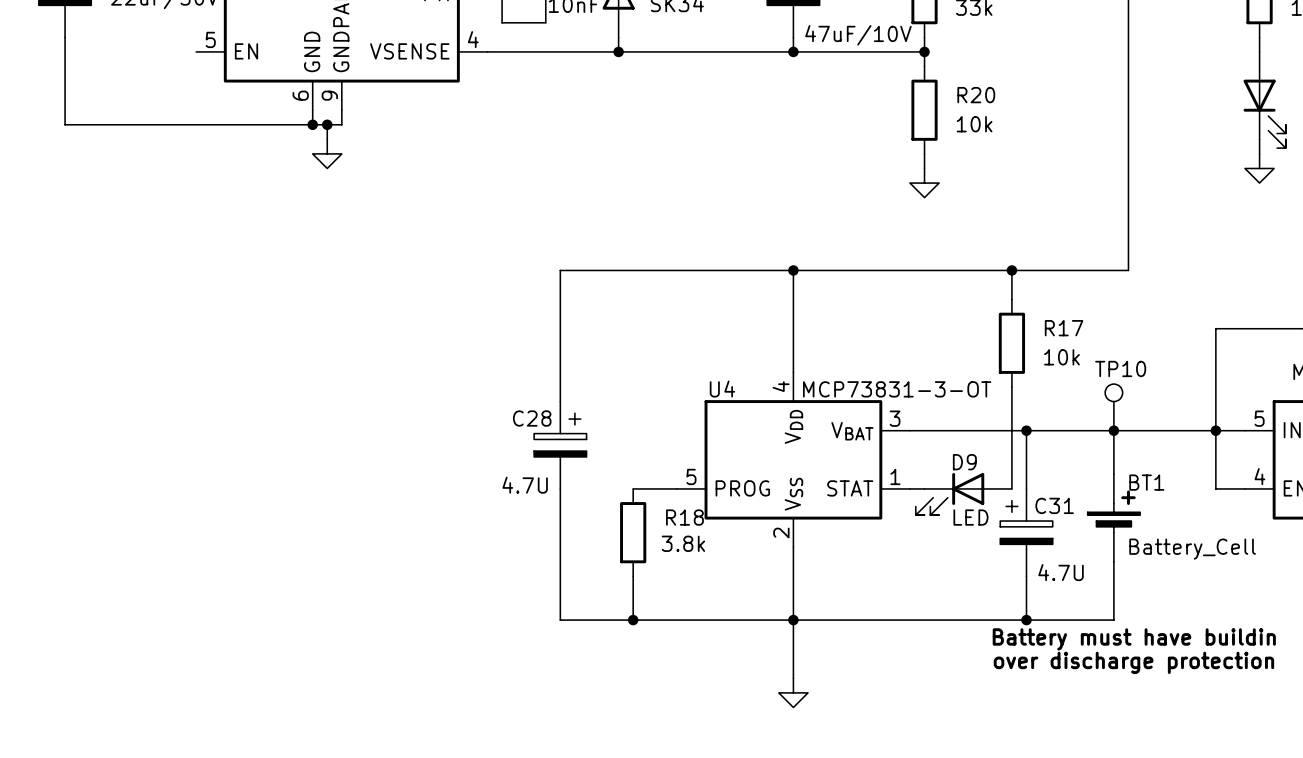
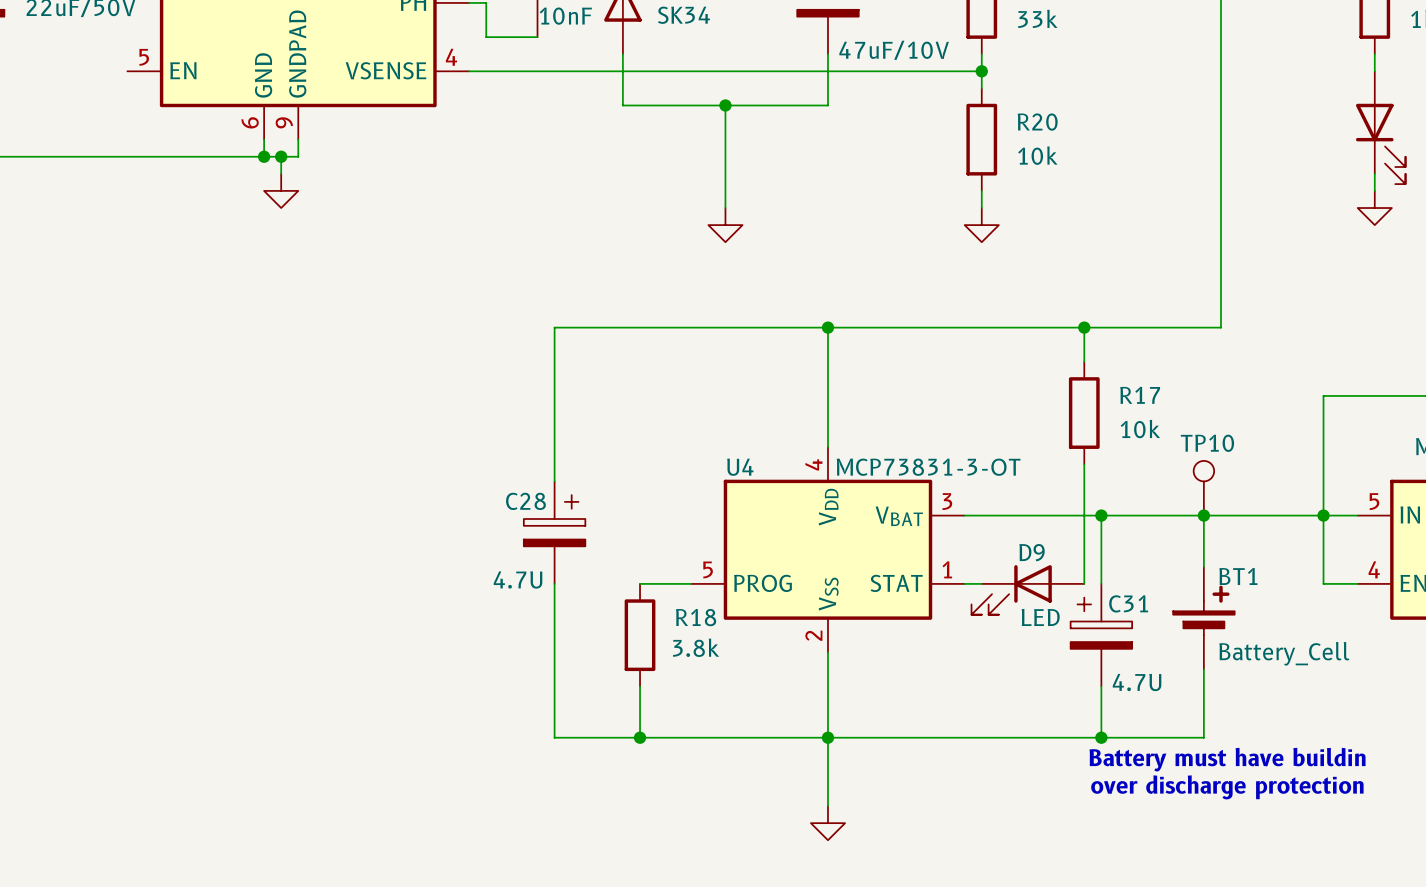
wire: none -> (622, 71) (622, 105) (827, 105) (827, 71)
junction: (618, 51) -> none
junction: (793, 51) -> none
wire: none -> (725, 105) (725, 208)
junction: none -> (725, 105)
power symbol: none -> (725, 225)

